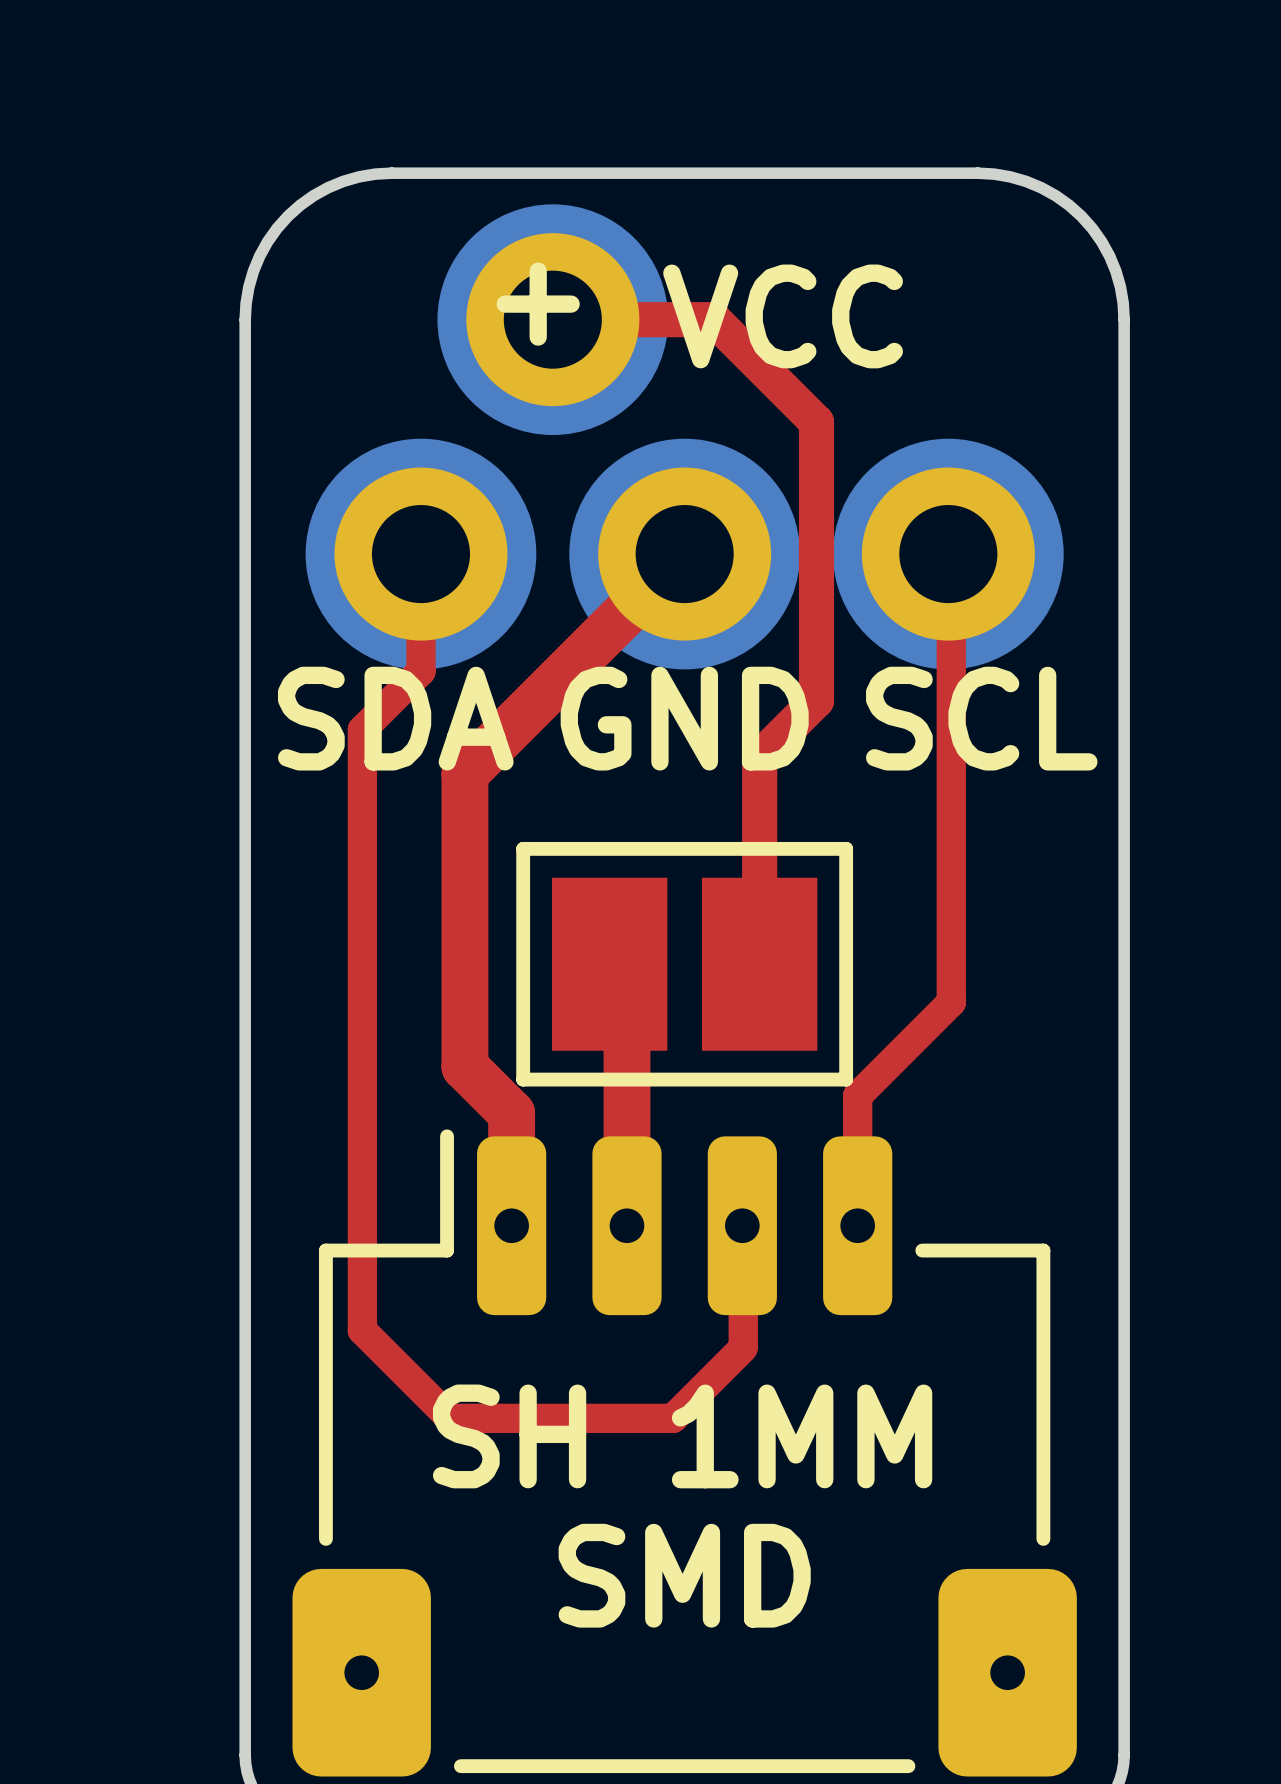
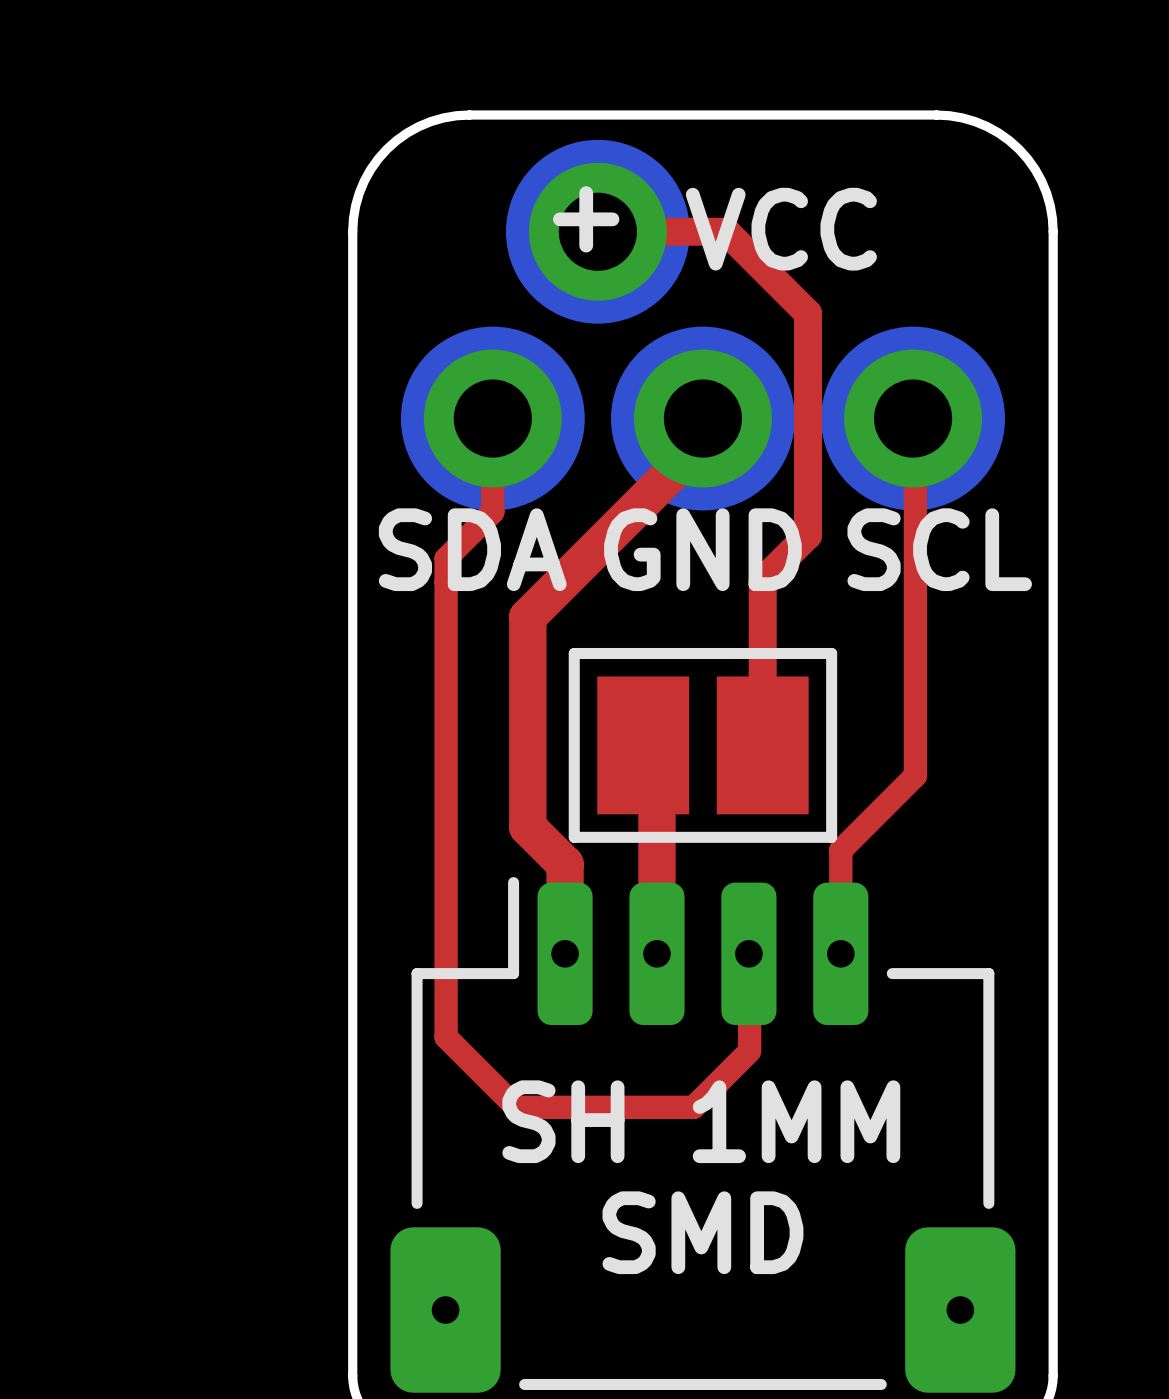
top track: (684, 554) (464, 773) (464, 803) -> (702, 418) (702, 441) (527, 617)

